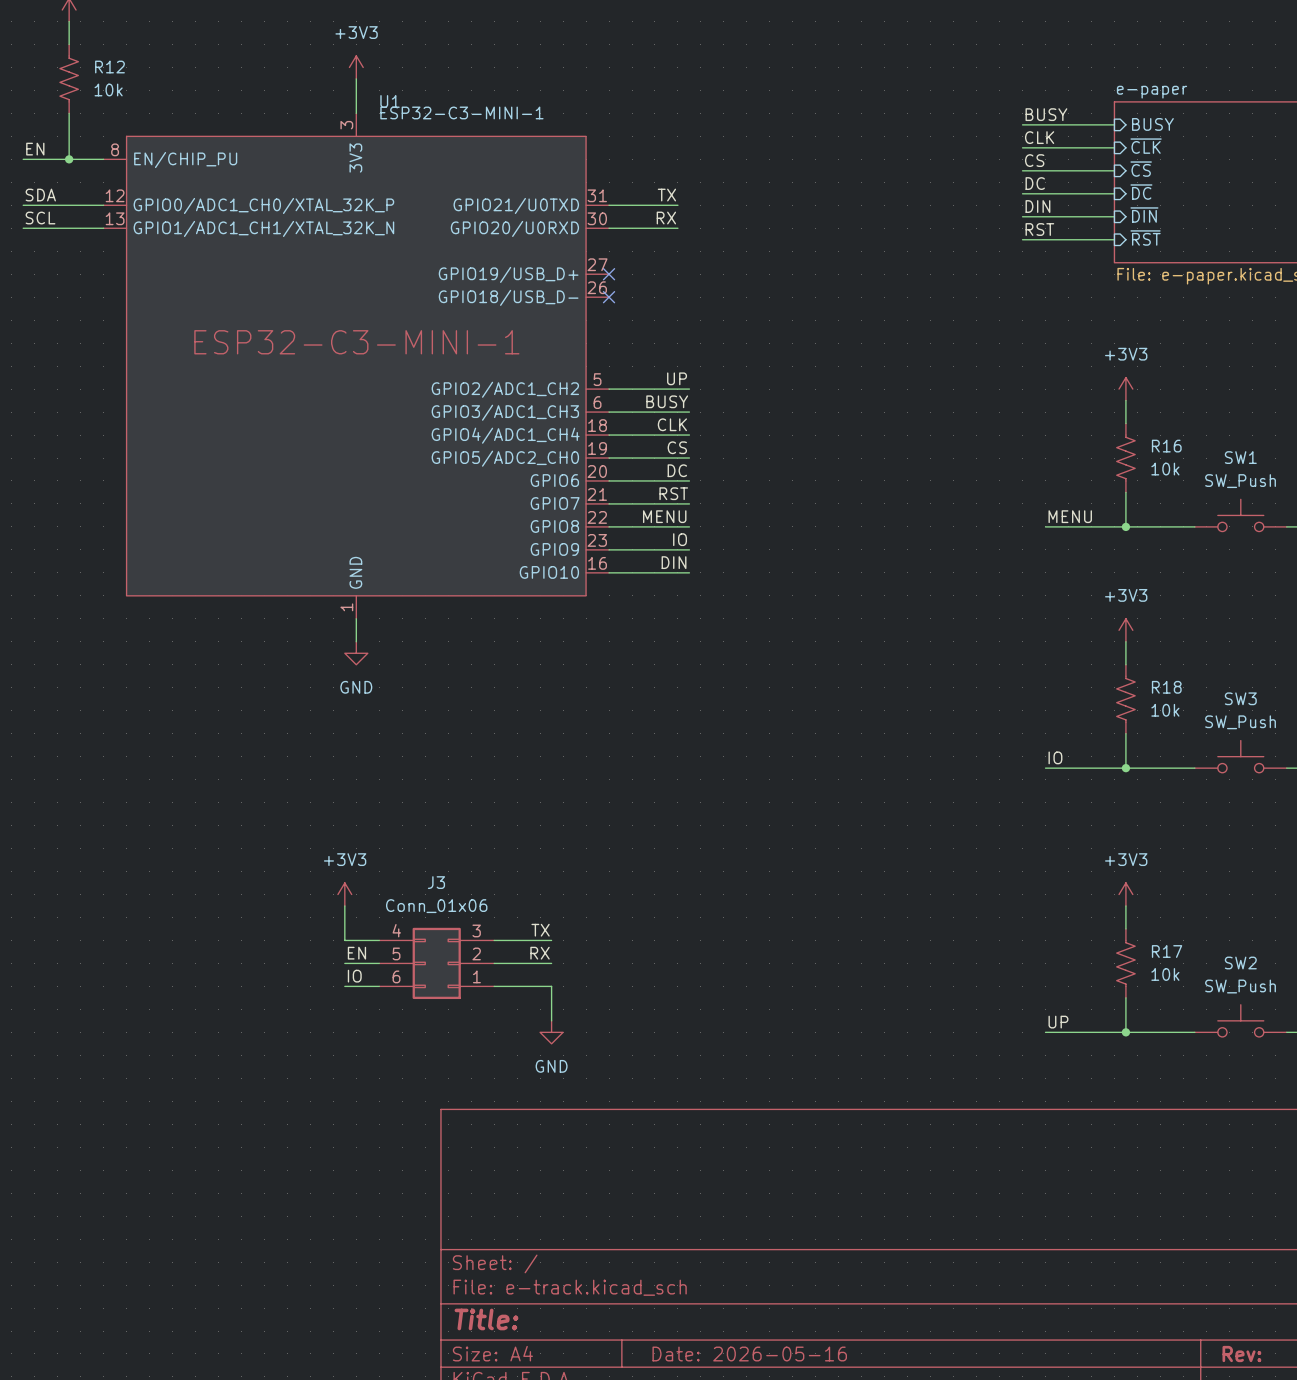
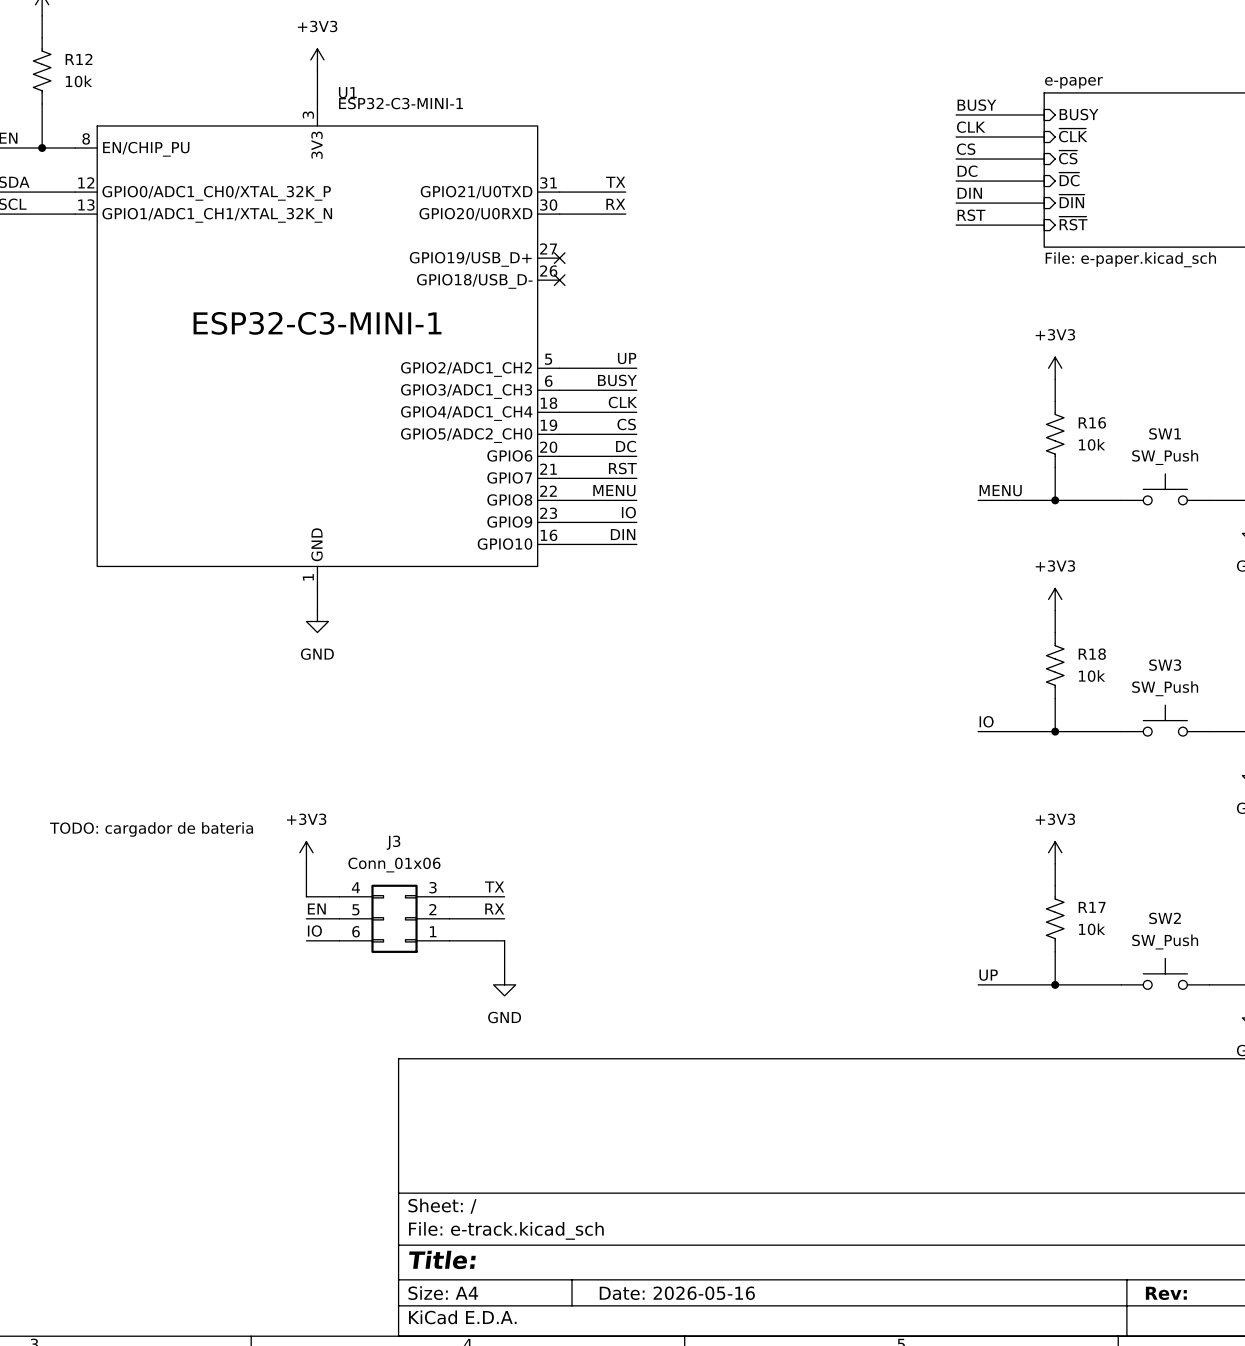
text: none -> TODO: cargador de bateria (151, 829)

